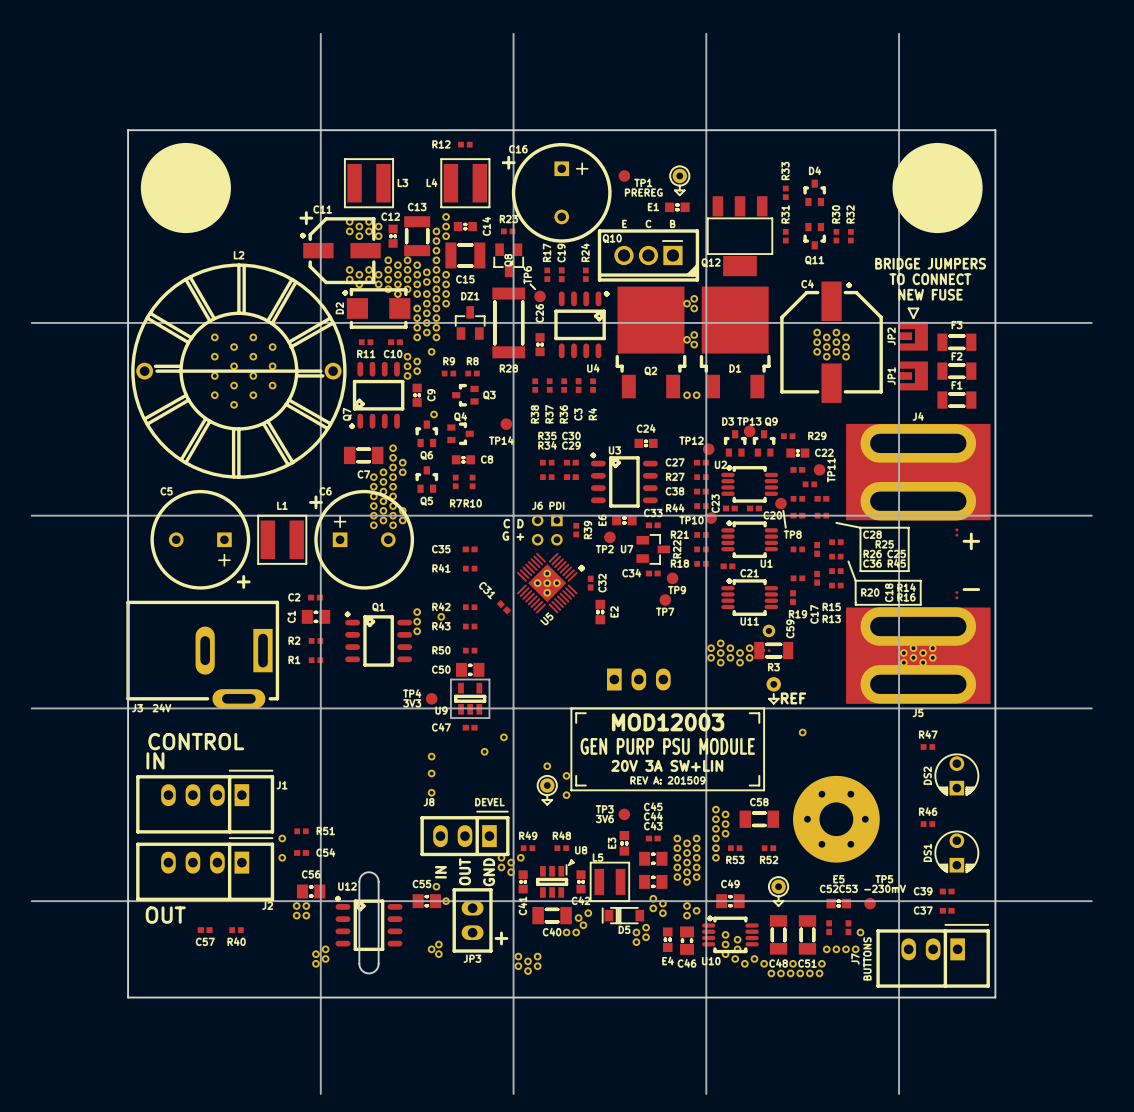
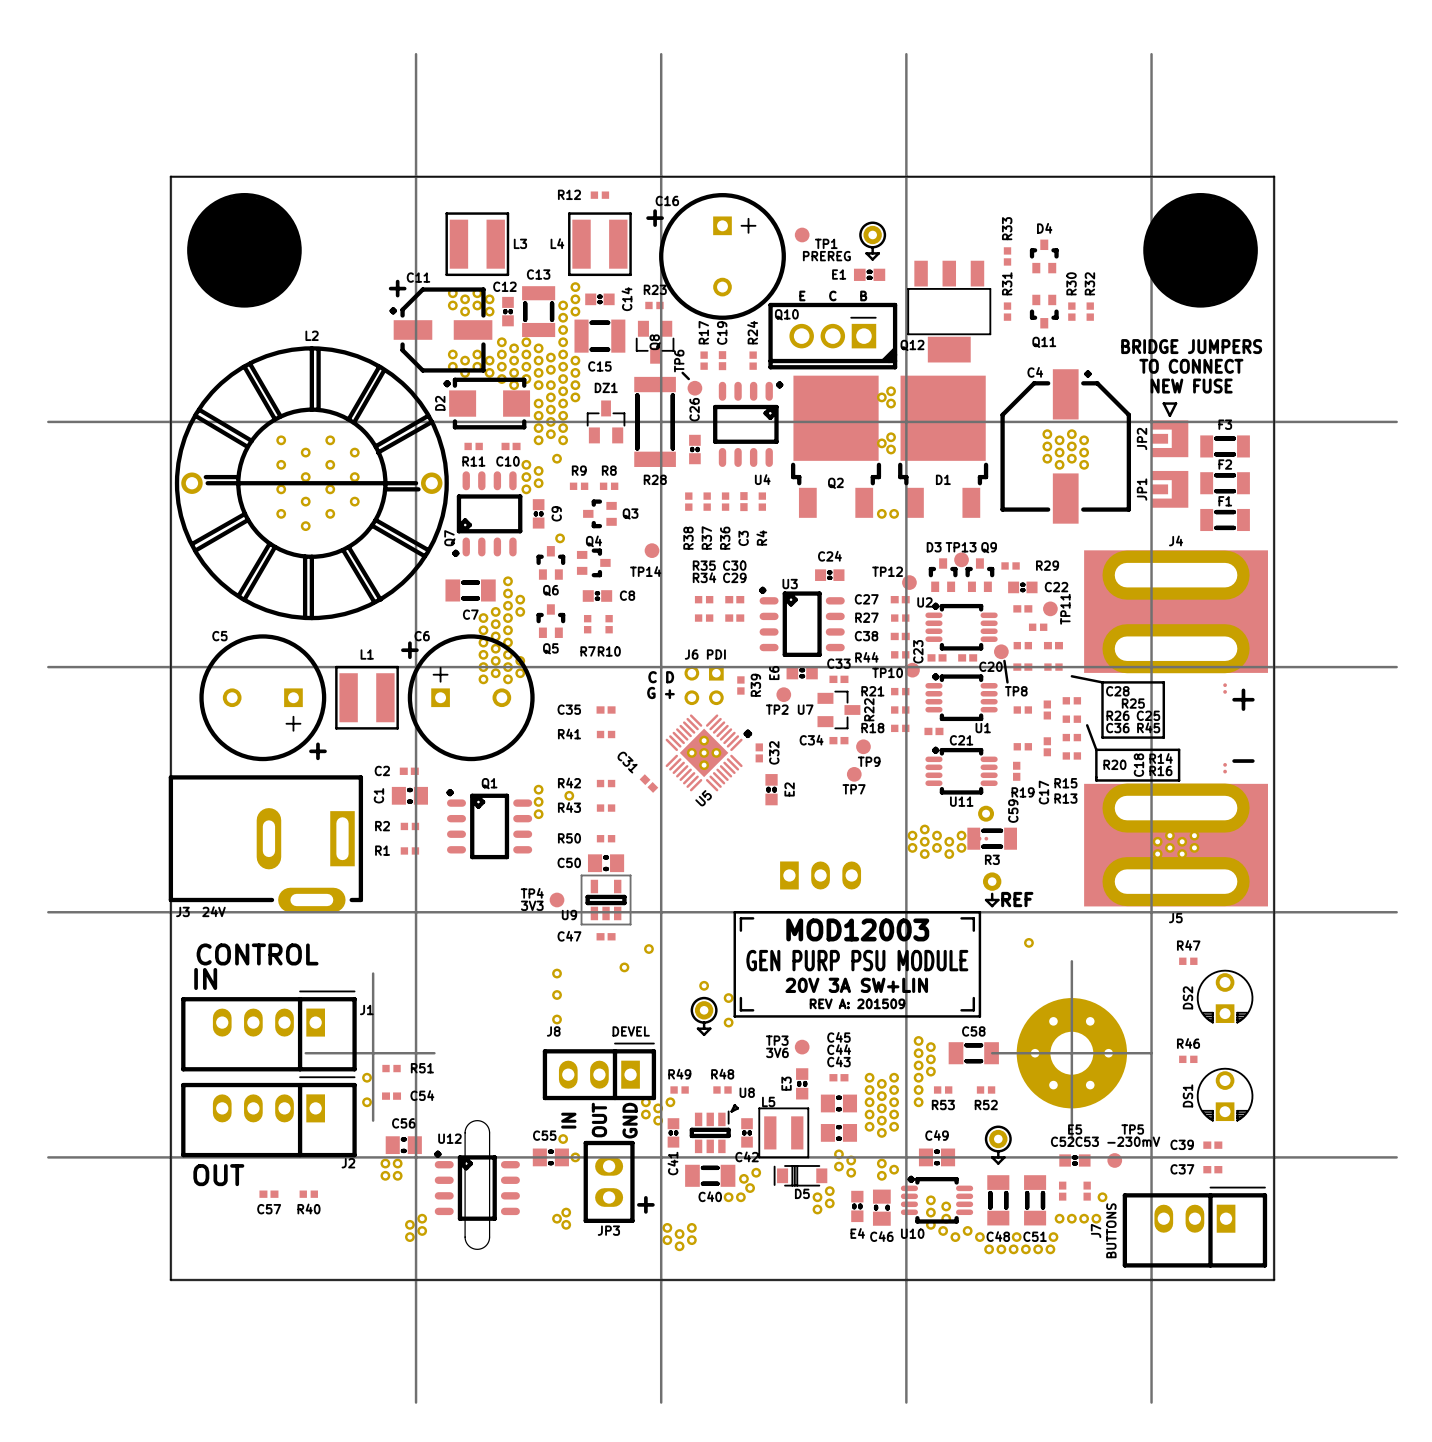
line: none -> (170, 176) (1274, 176) (1274, 1279) (170, 1279) (170, 176)
line: none -> (1071, 961) (1071, 1139)
line: none -> (373, 973) (373, 1120)
line: none -> (305, 1053) (434, 1053)
line: none -> (992, 1053) (1151, 1053)

